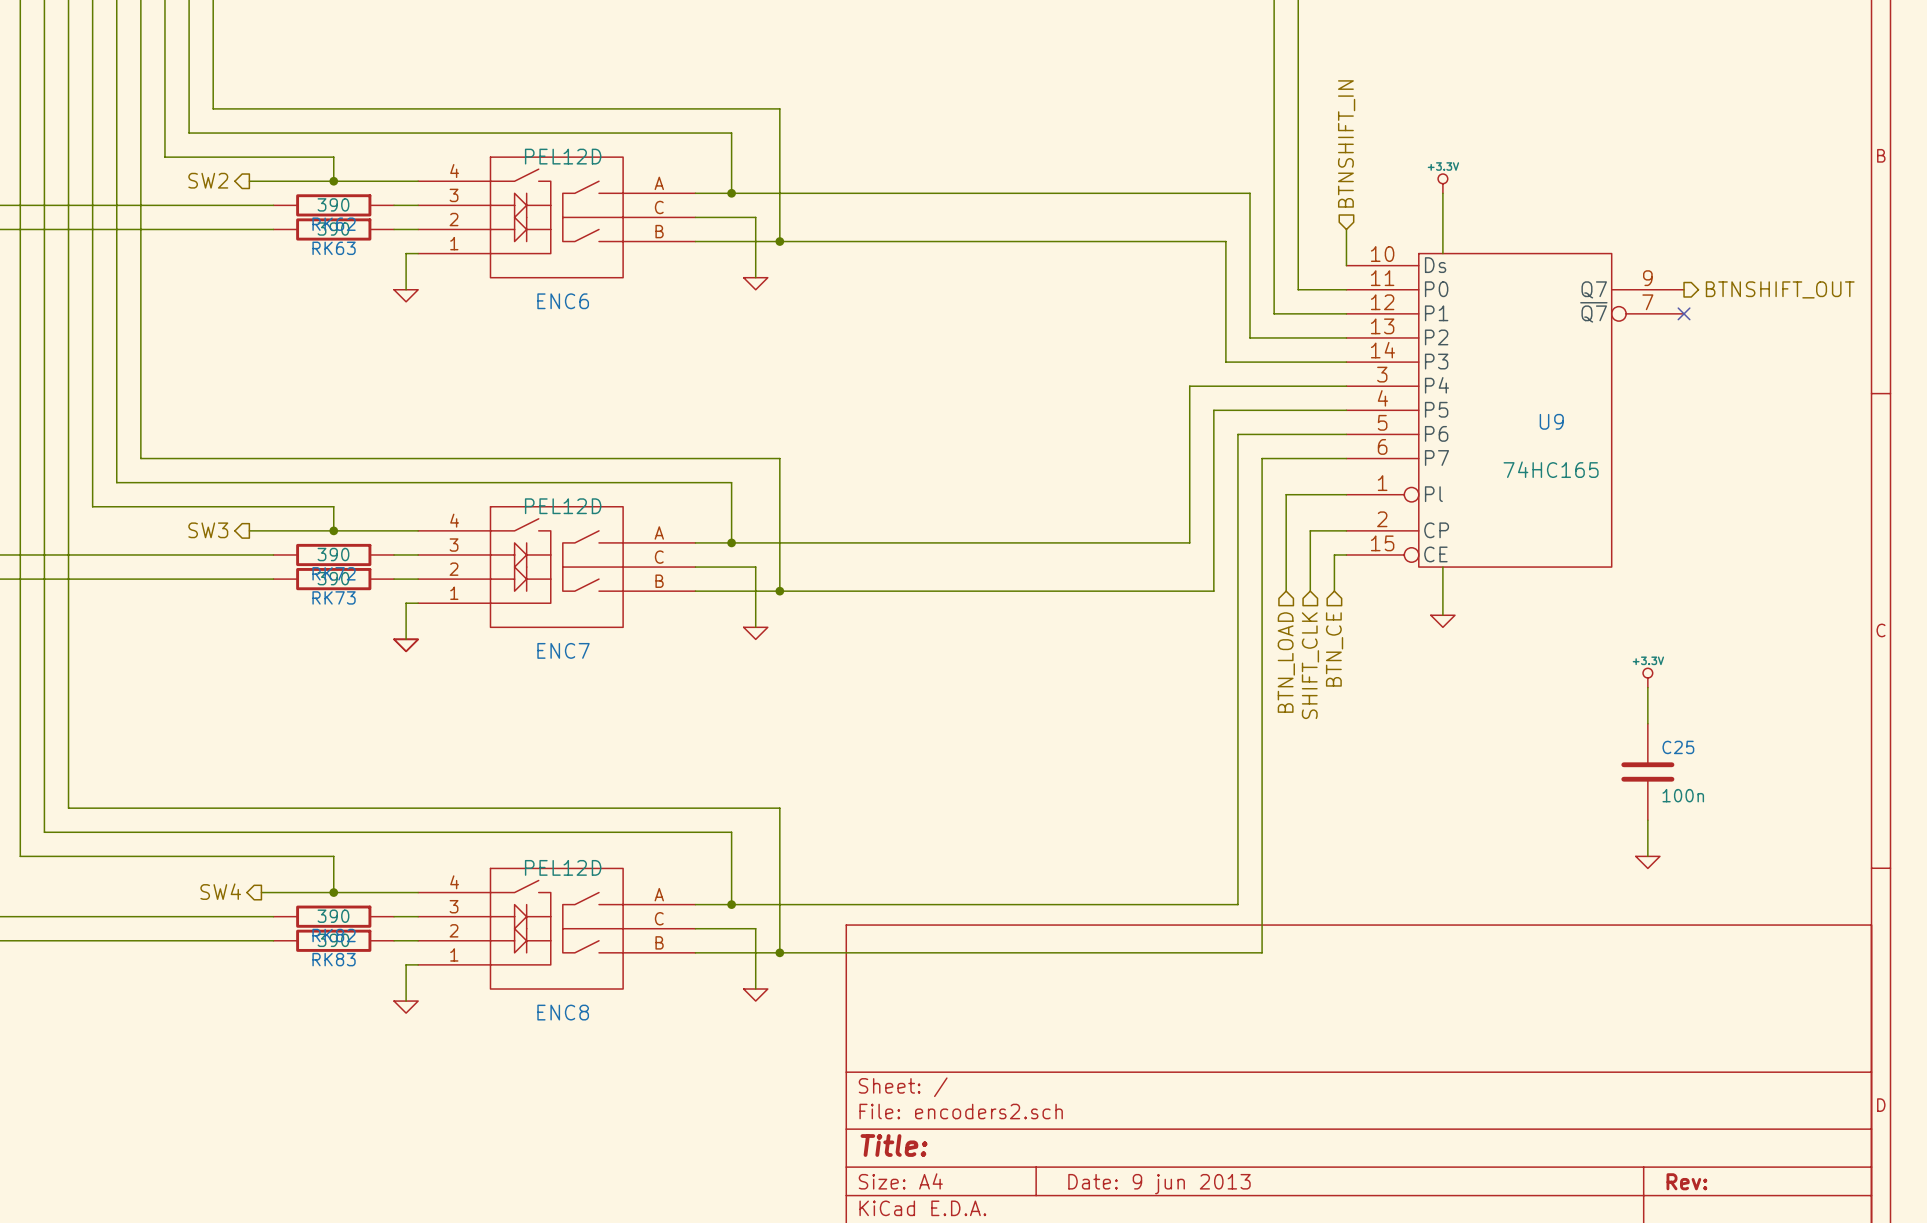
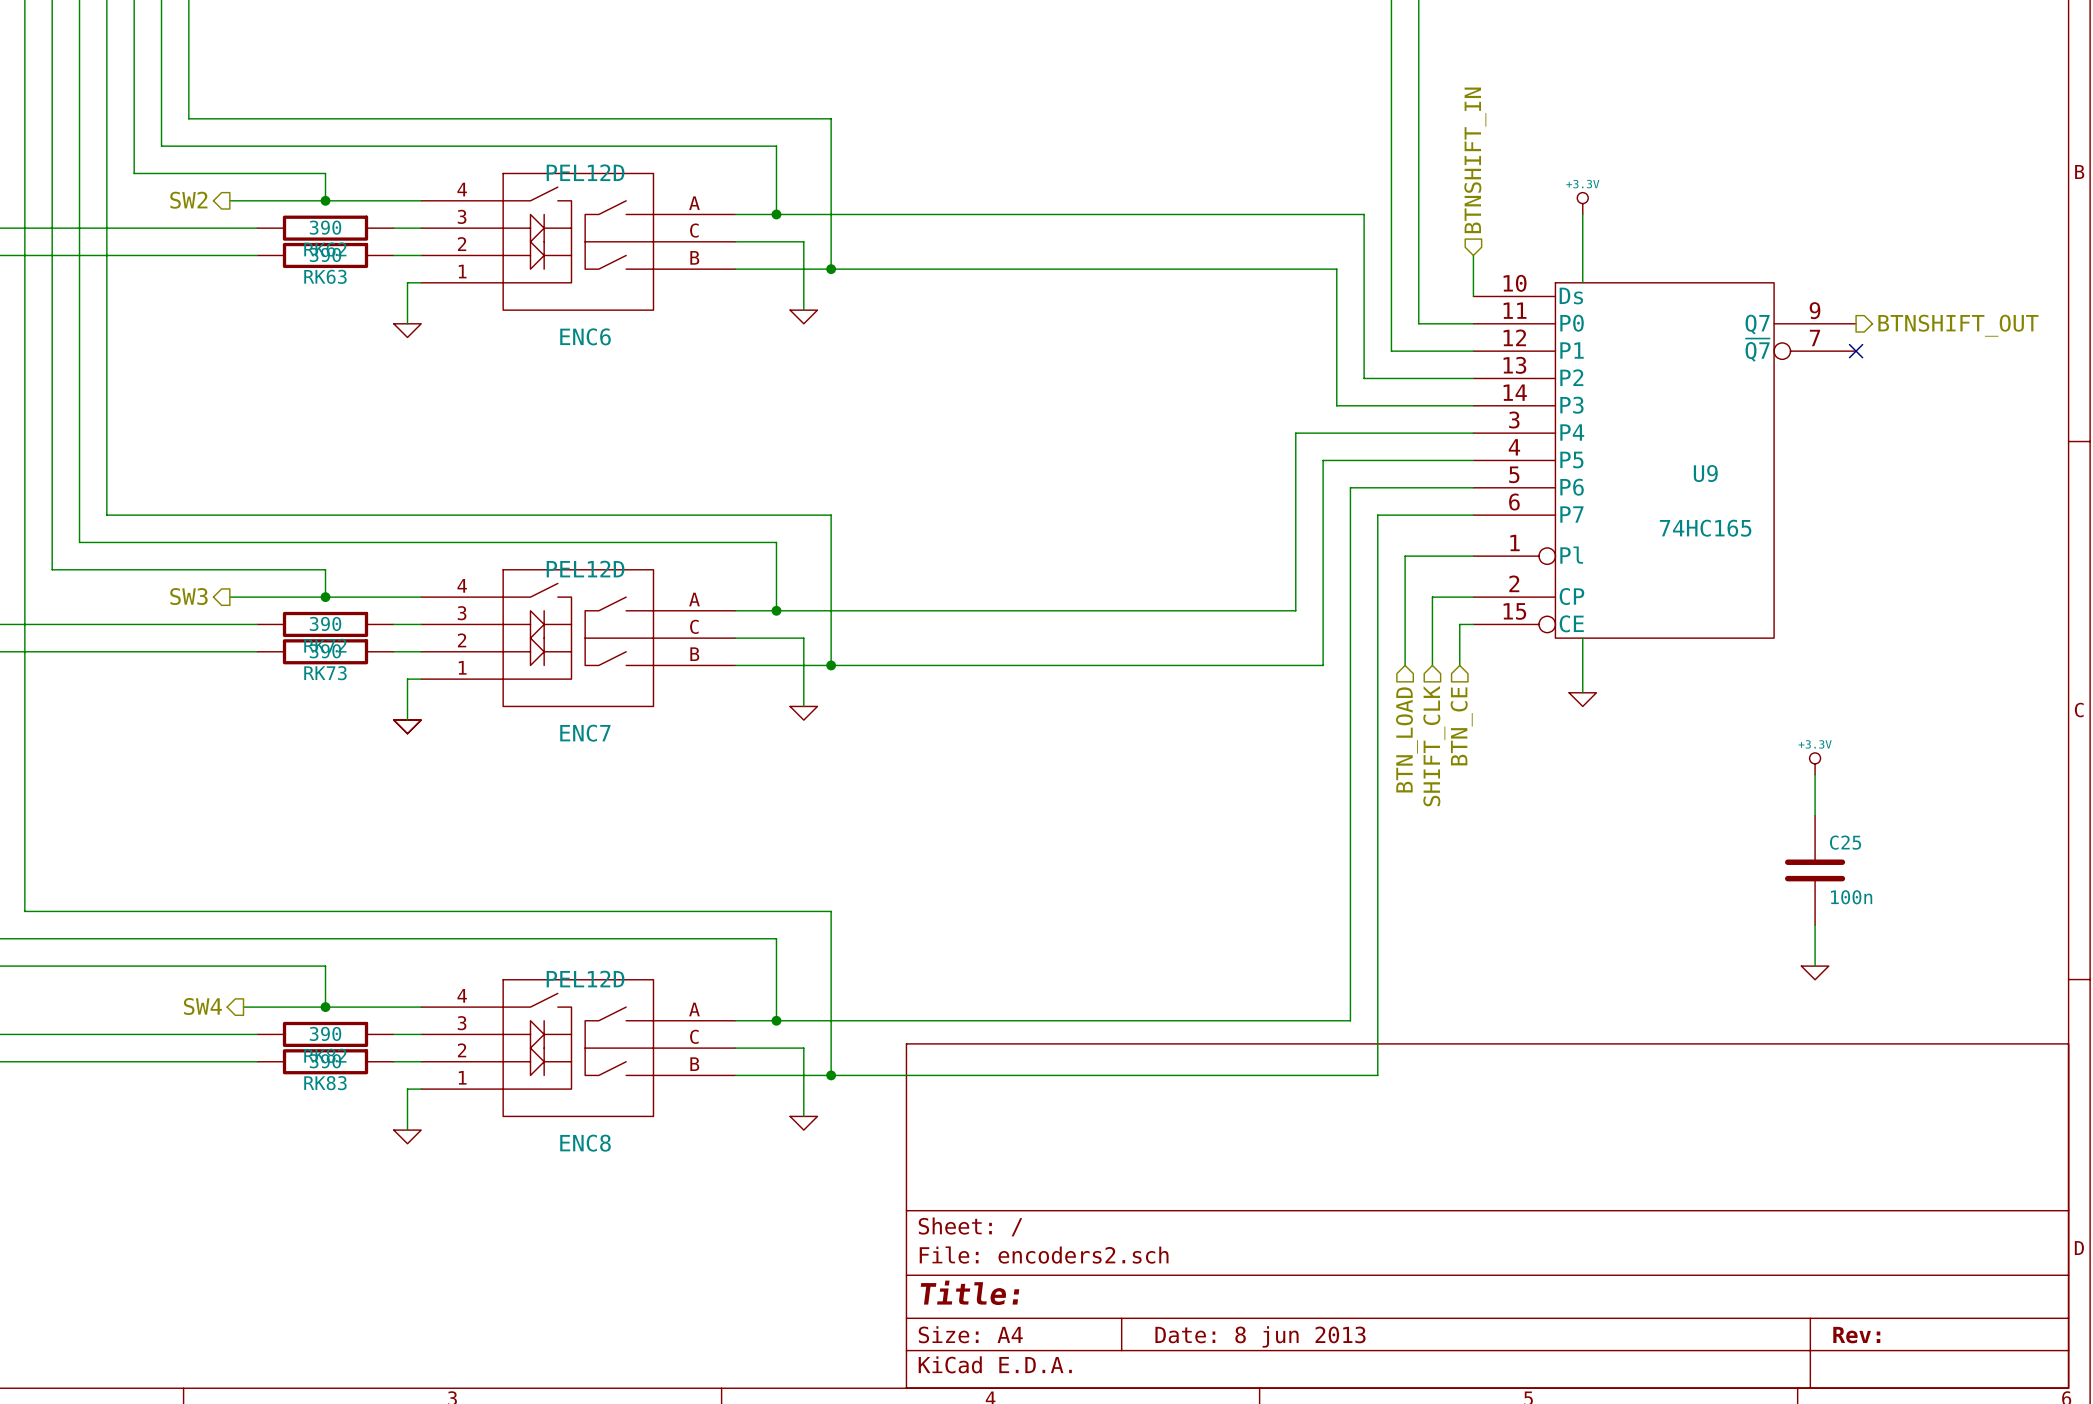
title block: Date: 9 jun 2013 (1159, 1184) -> Date: 8 jun 2013 (1260, 1336)

